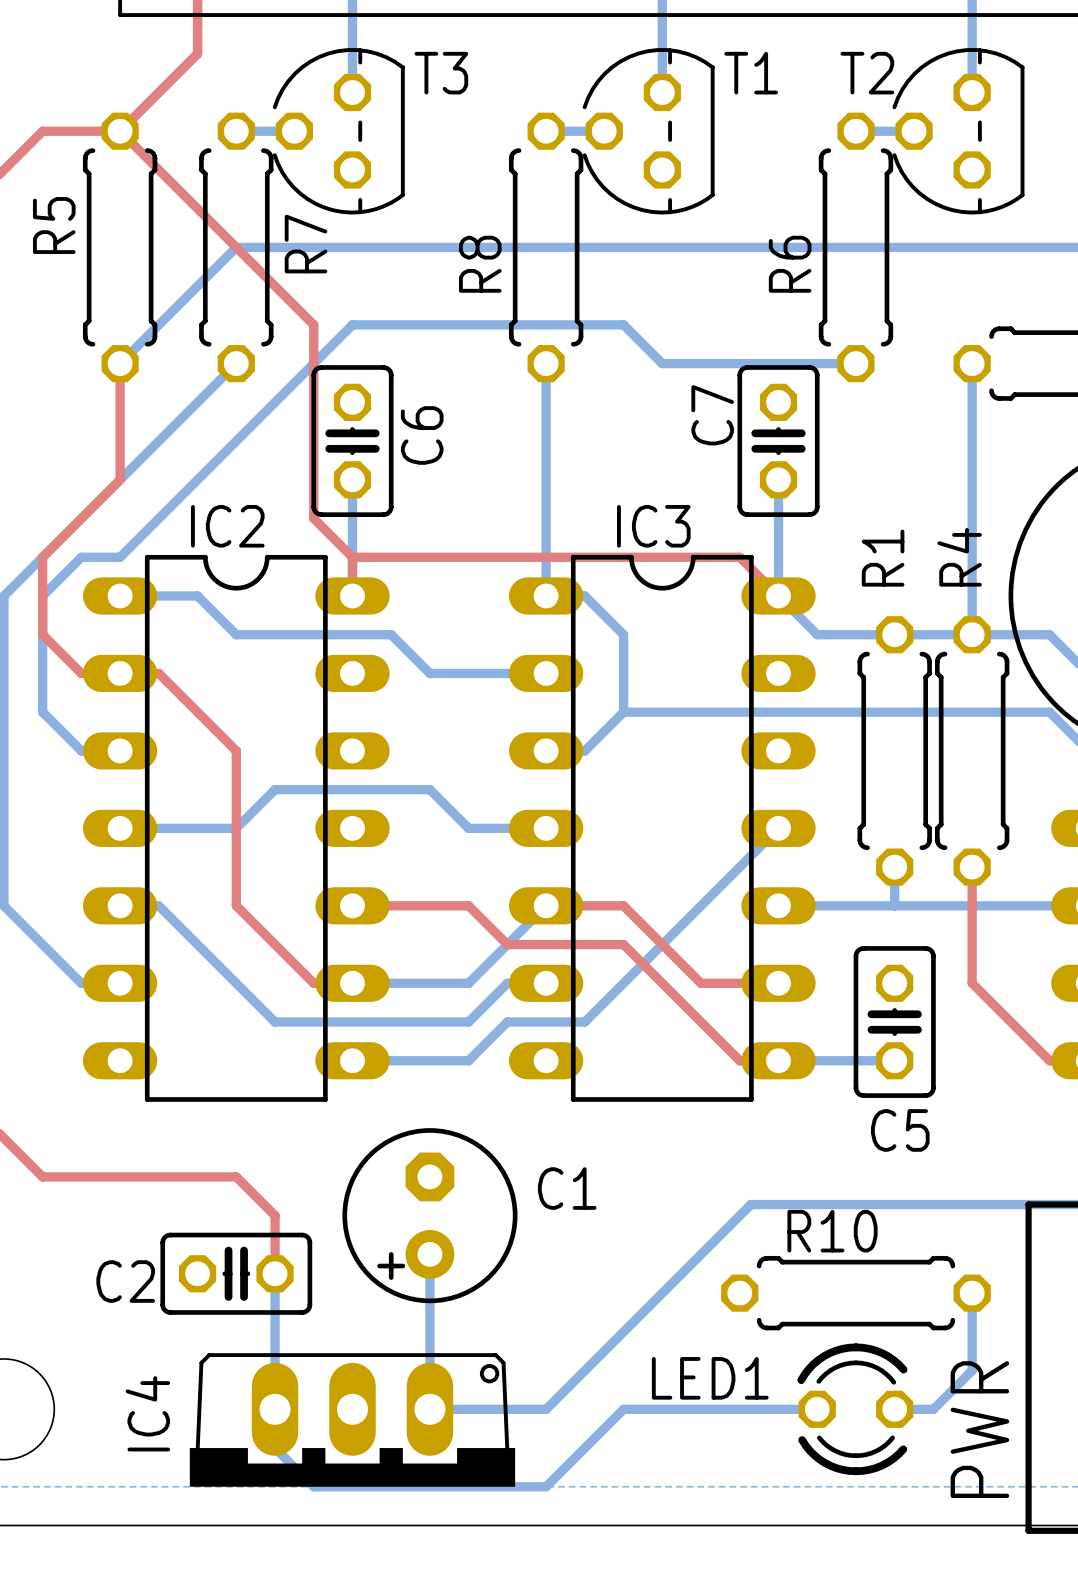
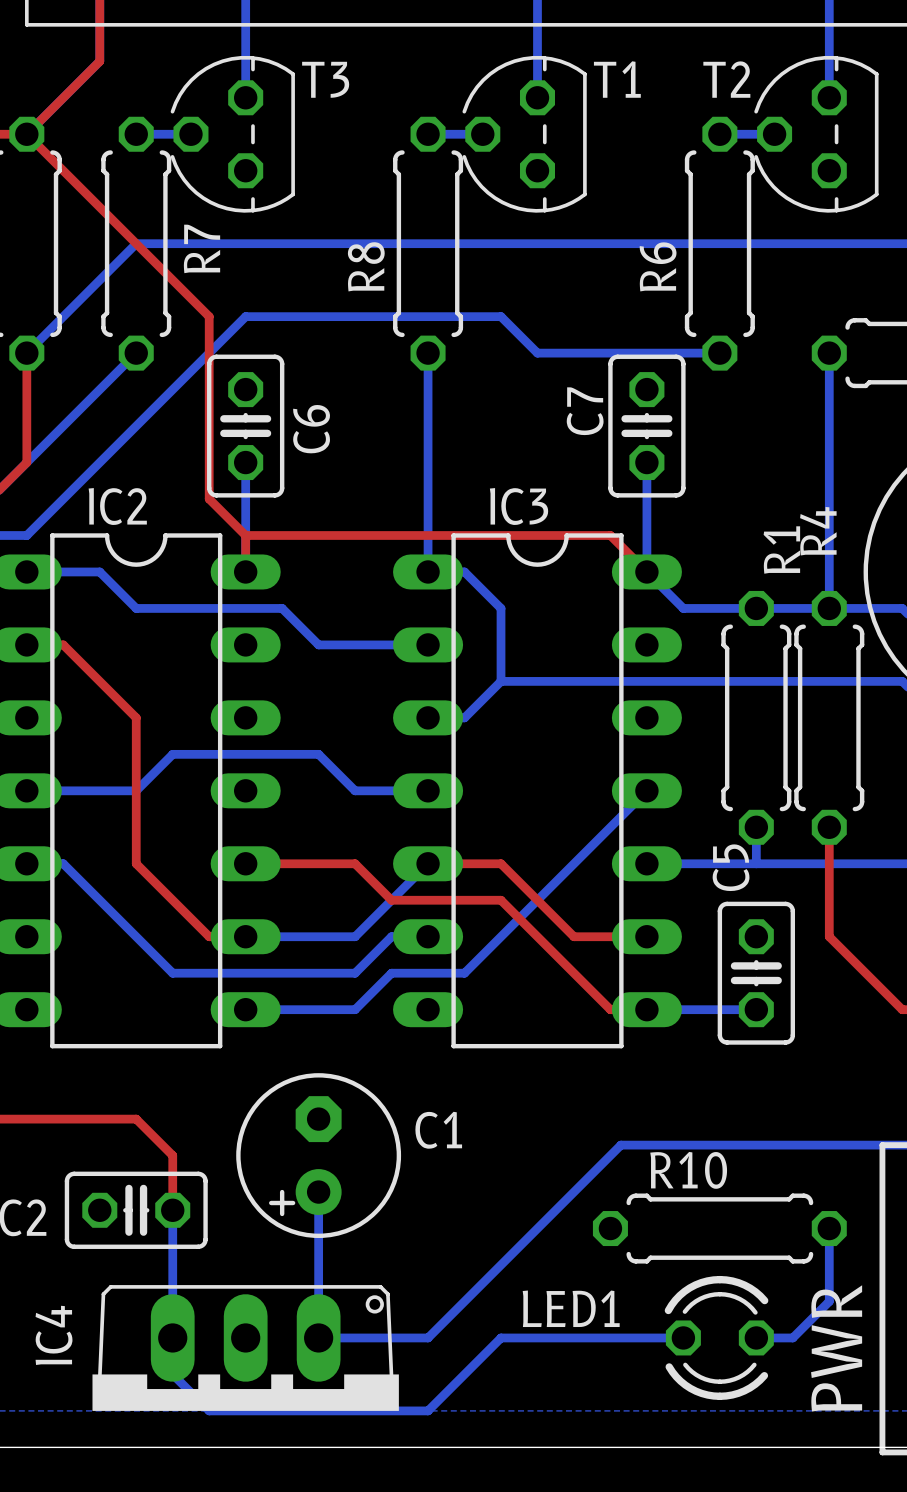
R1 name position: R1 (883, 558) -> R1 (781, 550)
C5 name rotation: 0° (900, 1130) -> 90° counterclockwise (731, 867)
C5 name position: C5 (900, 1130) -> C5 (731, 867)

